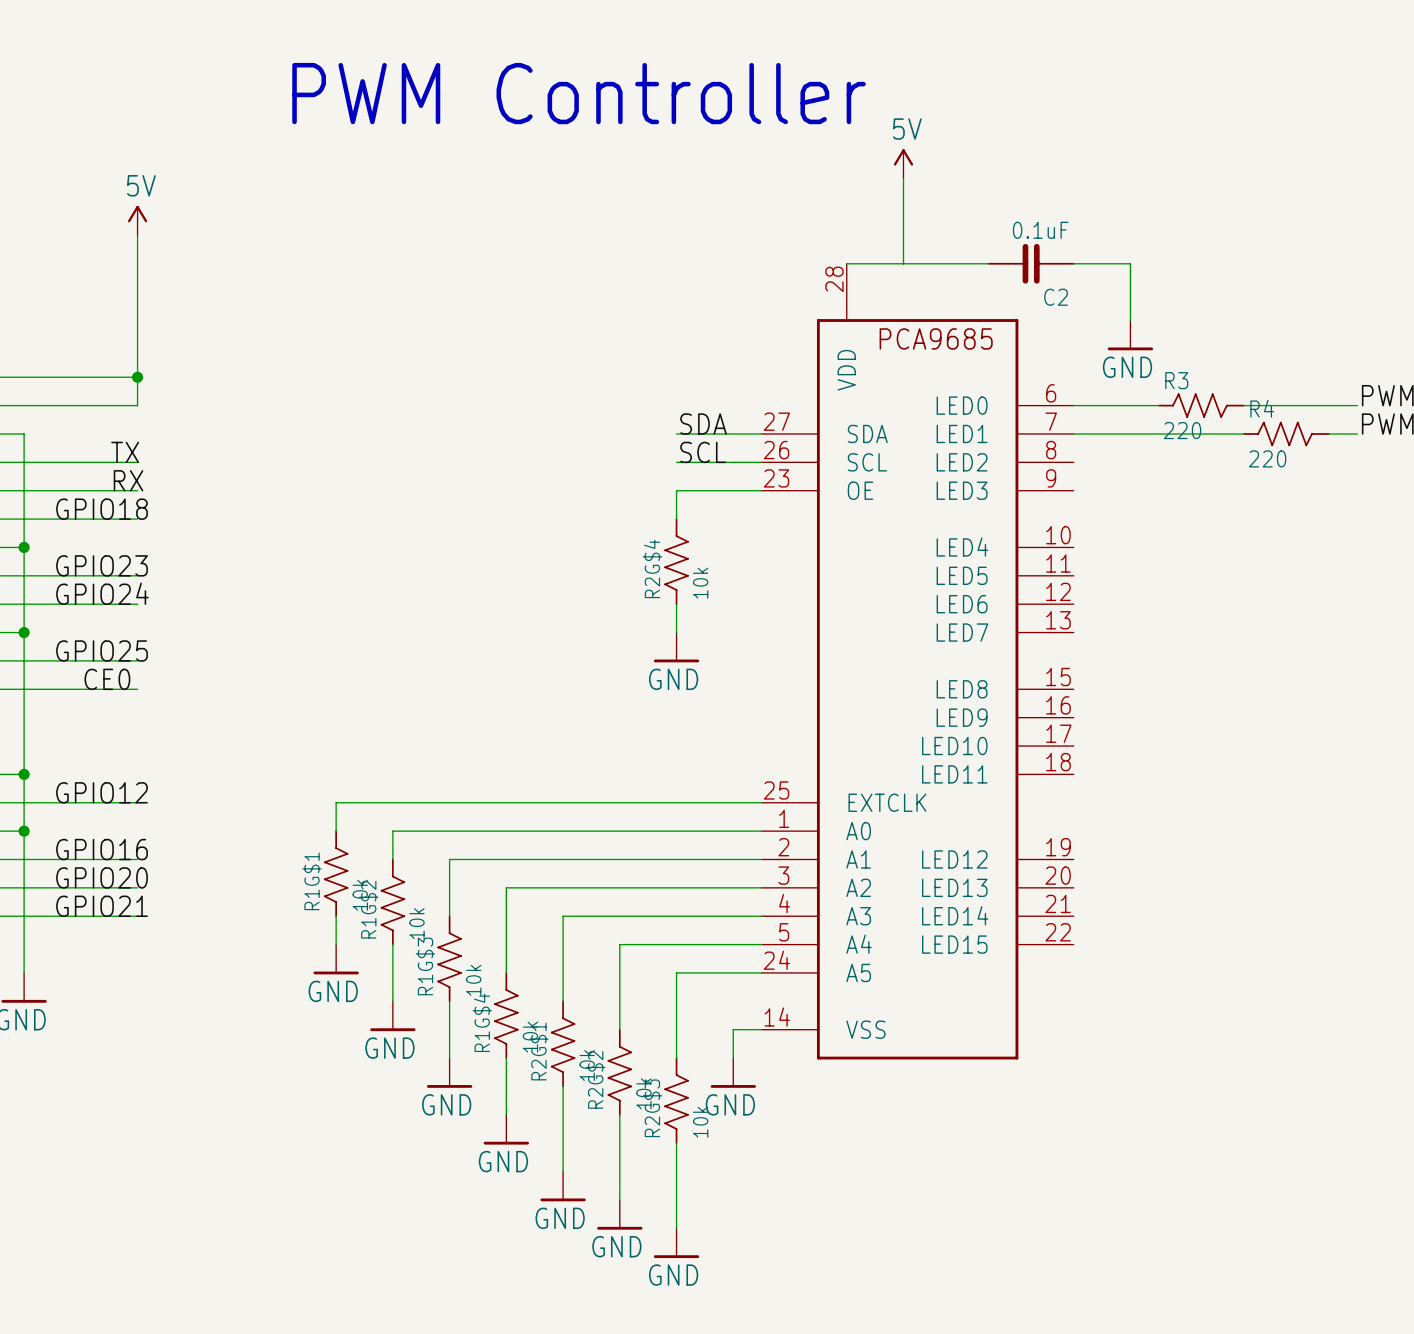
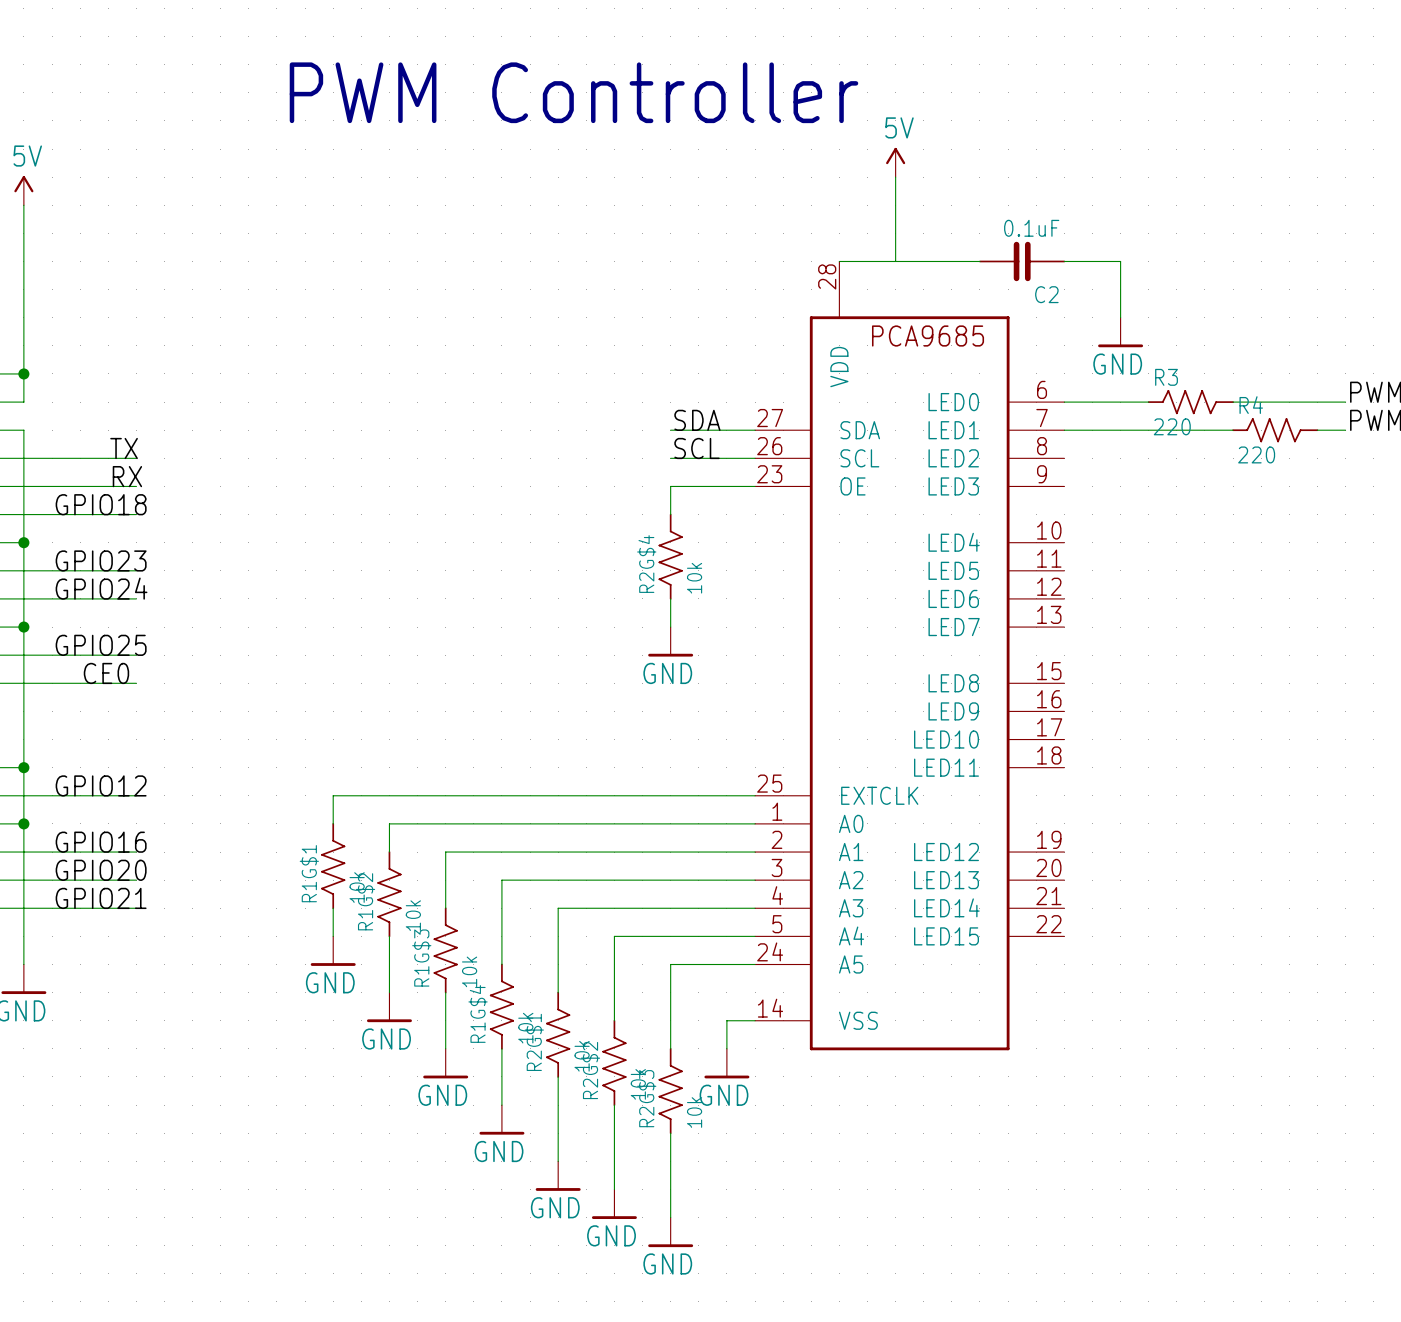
power symbol position: 5V (137, 220) -> 5V (23, 190)
wire: (137, 235) (137, 405) (24, 405) -> (23, 205) (23, 402)
wire: (24, 377) (137, 377) -> none
junction: none -> (23, 373)
junction: (137, 377) -> none

